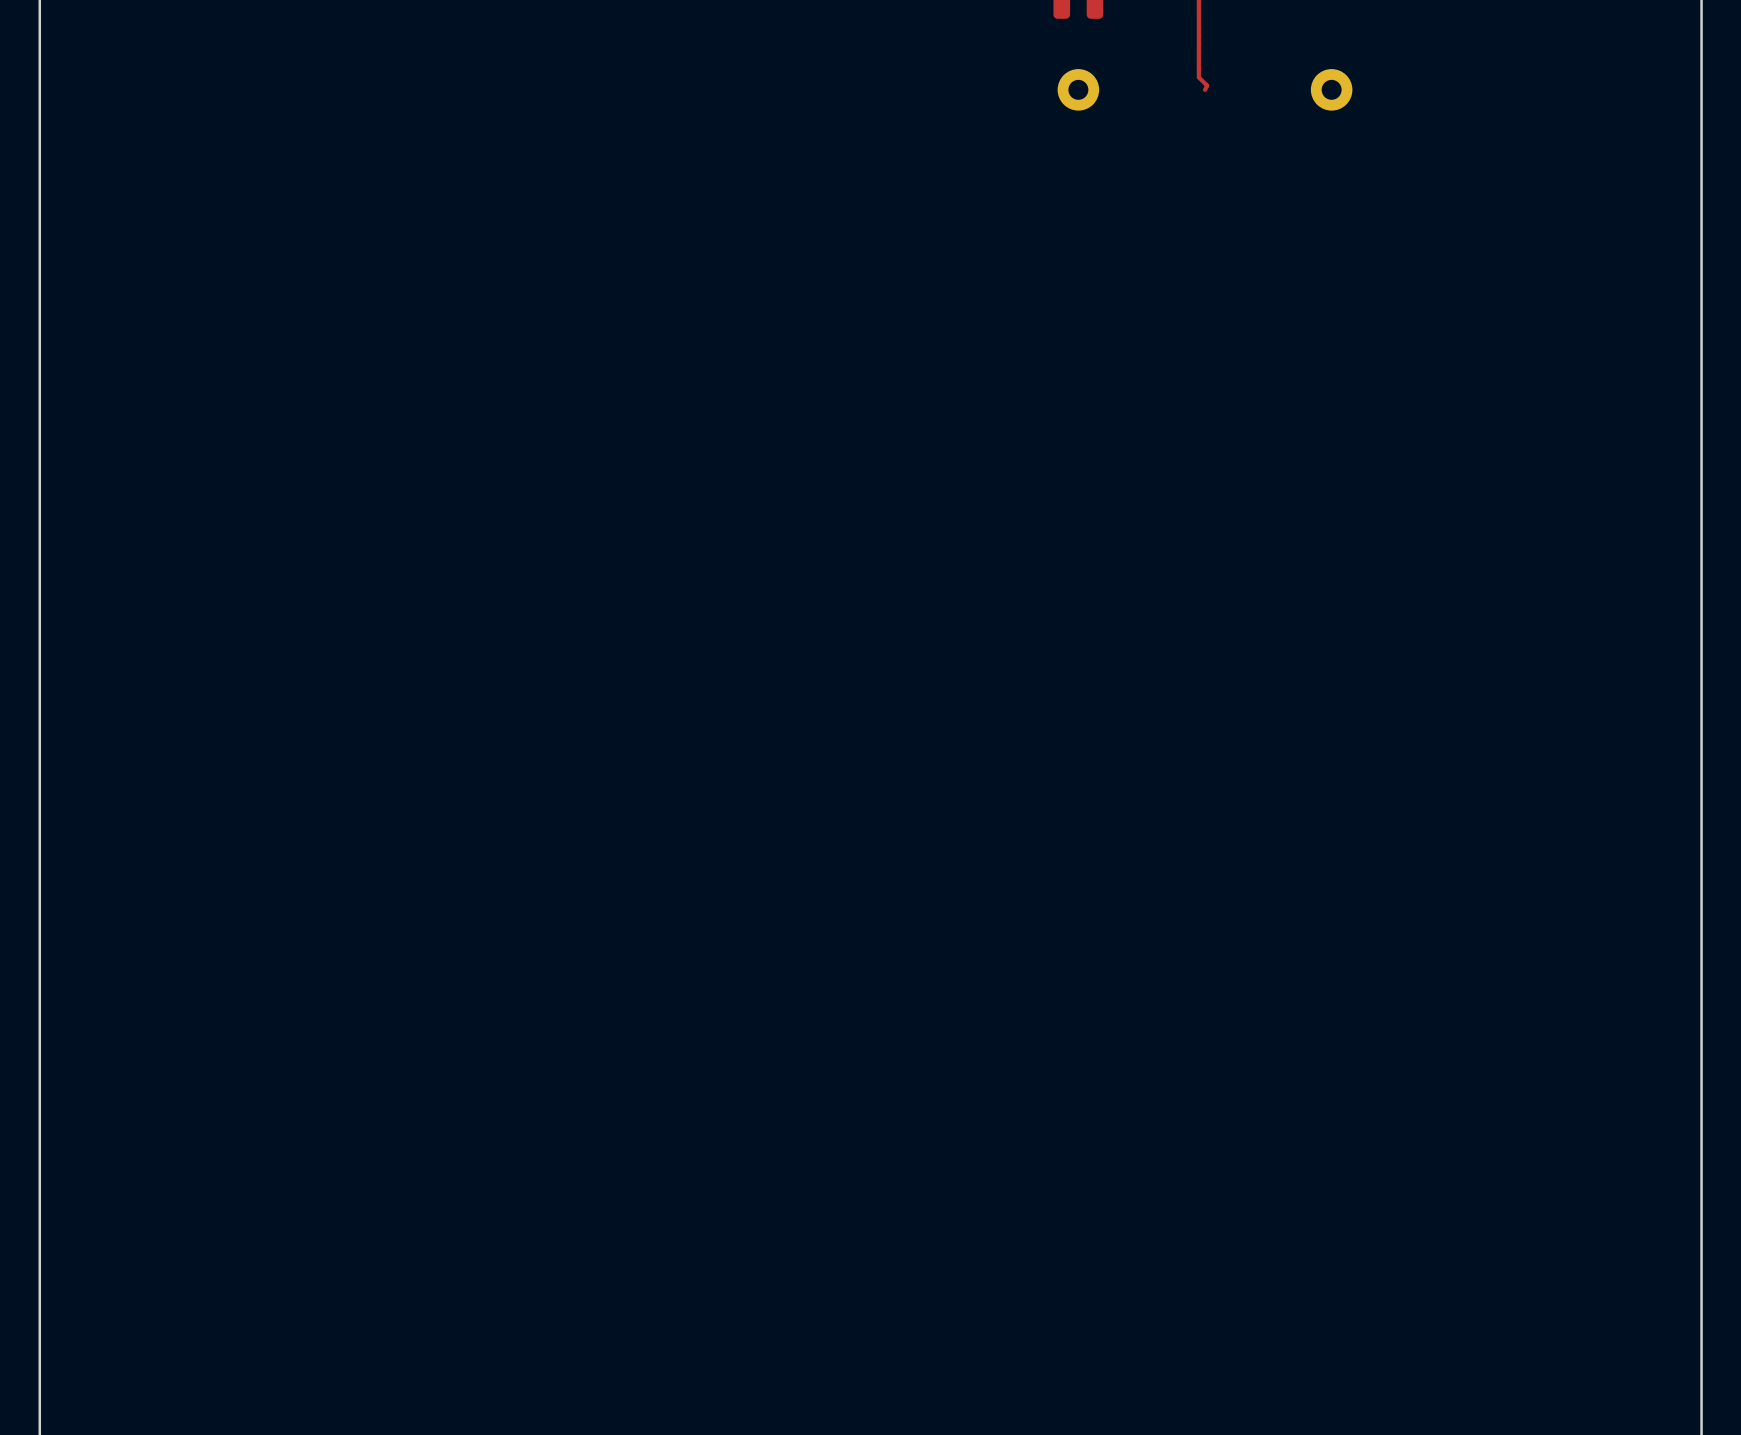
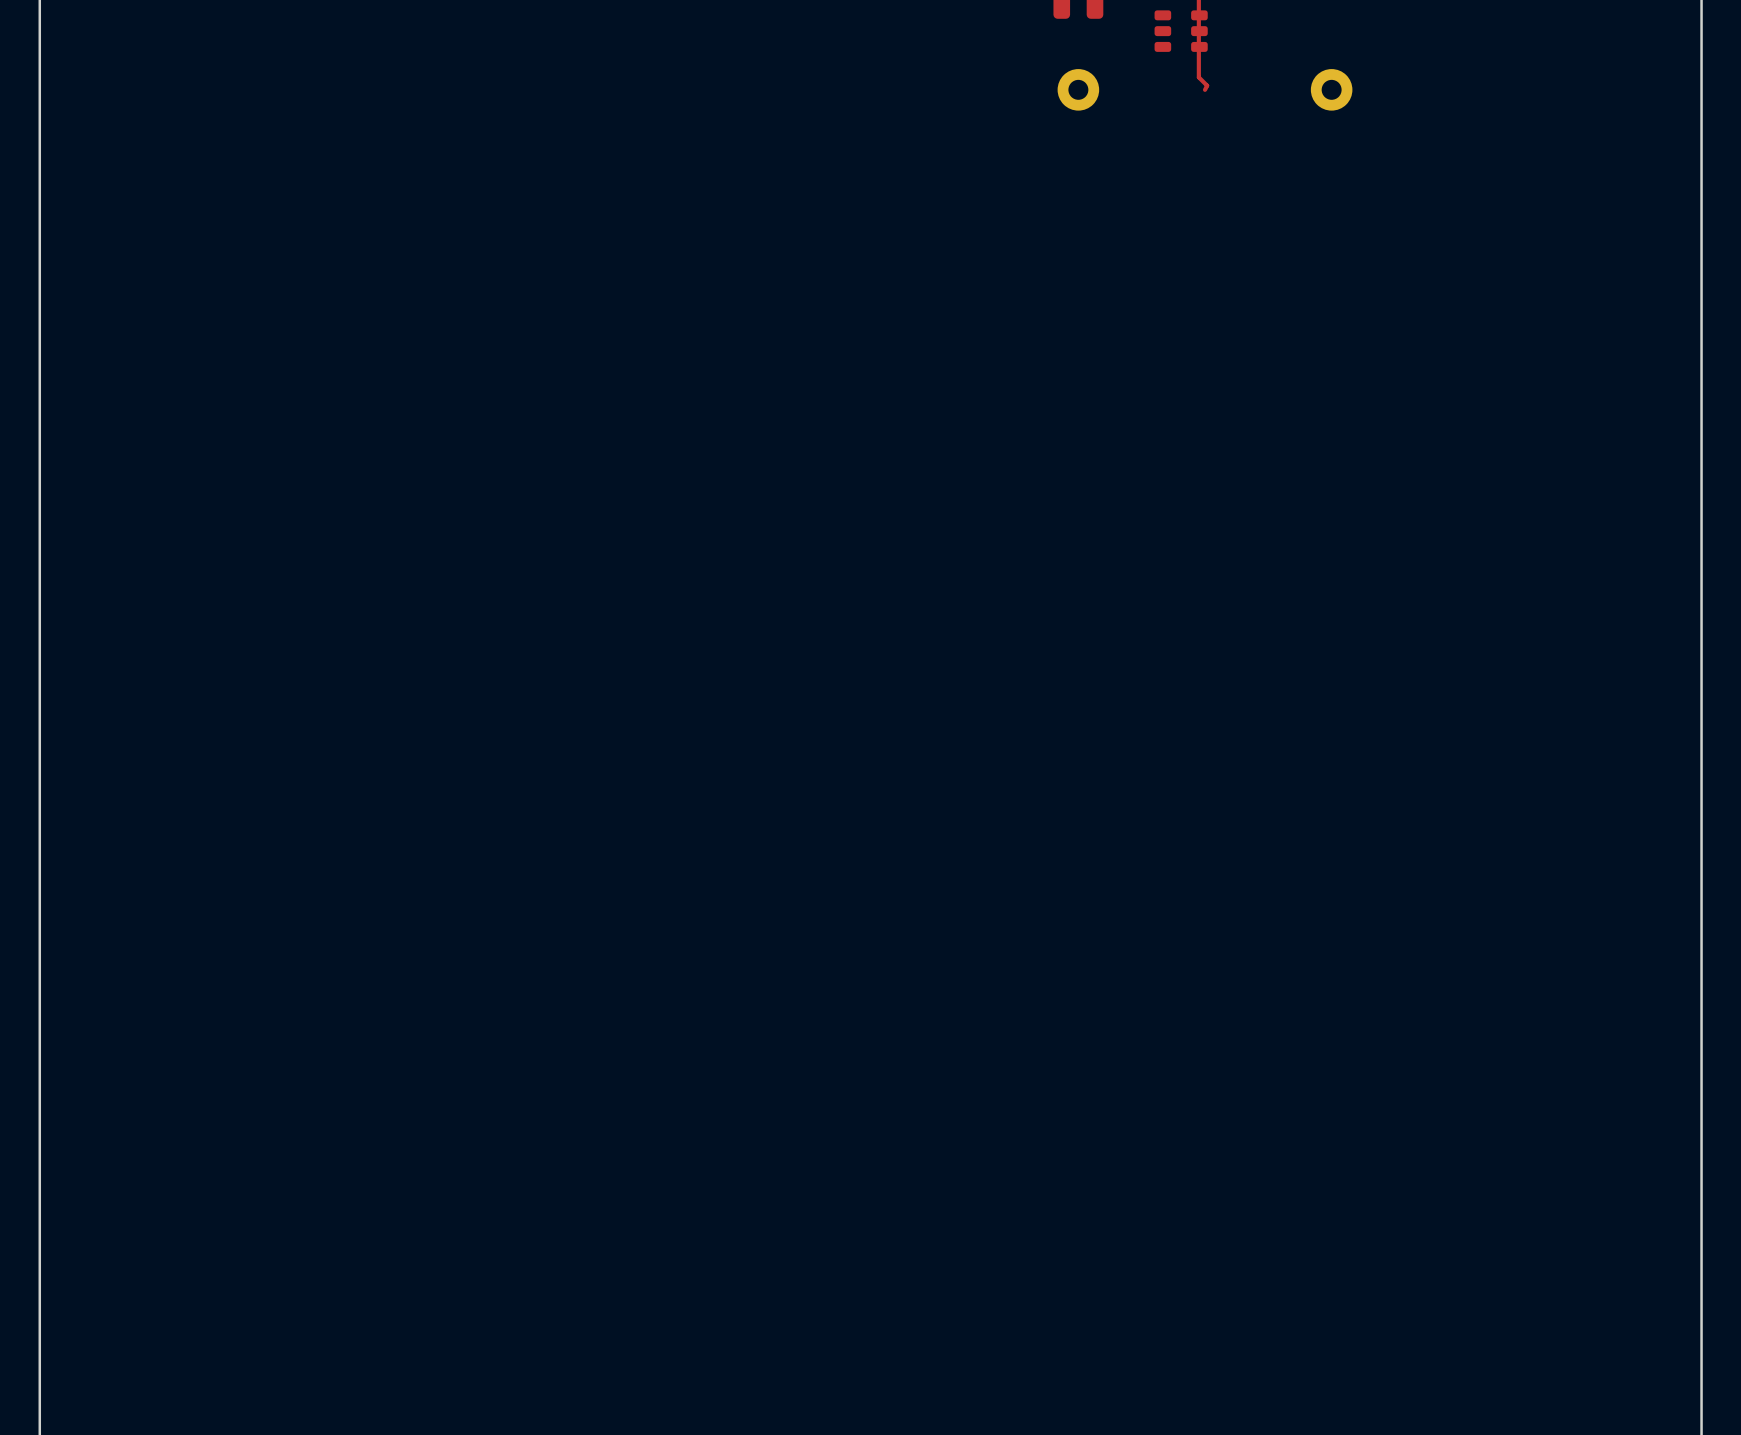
part: none -> (1181, 31)

